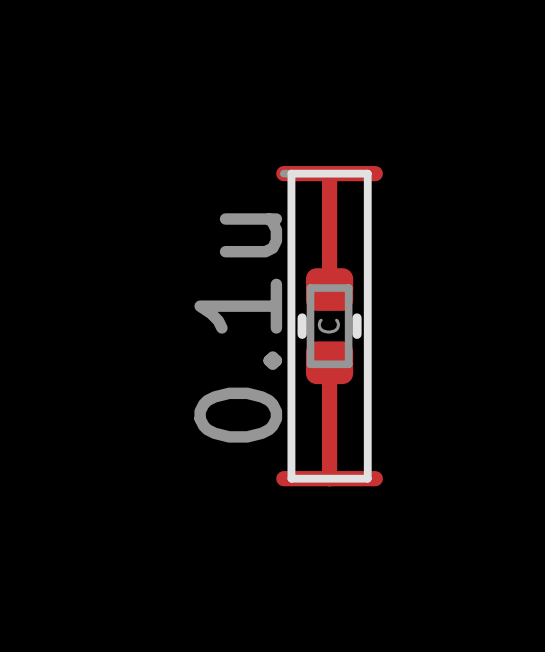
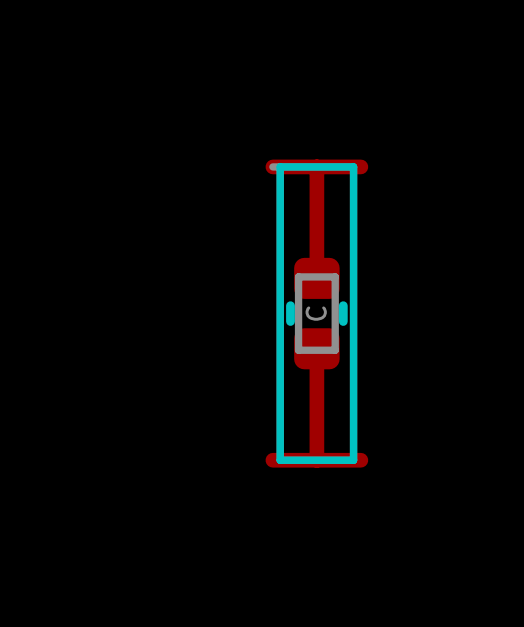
C value: 0.1u (238, 327) -> none

